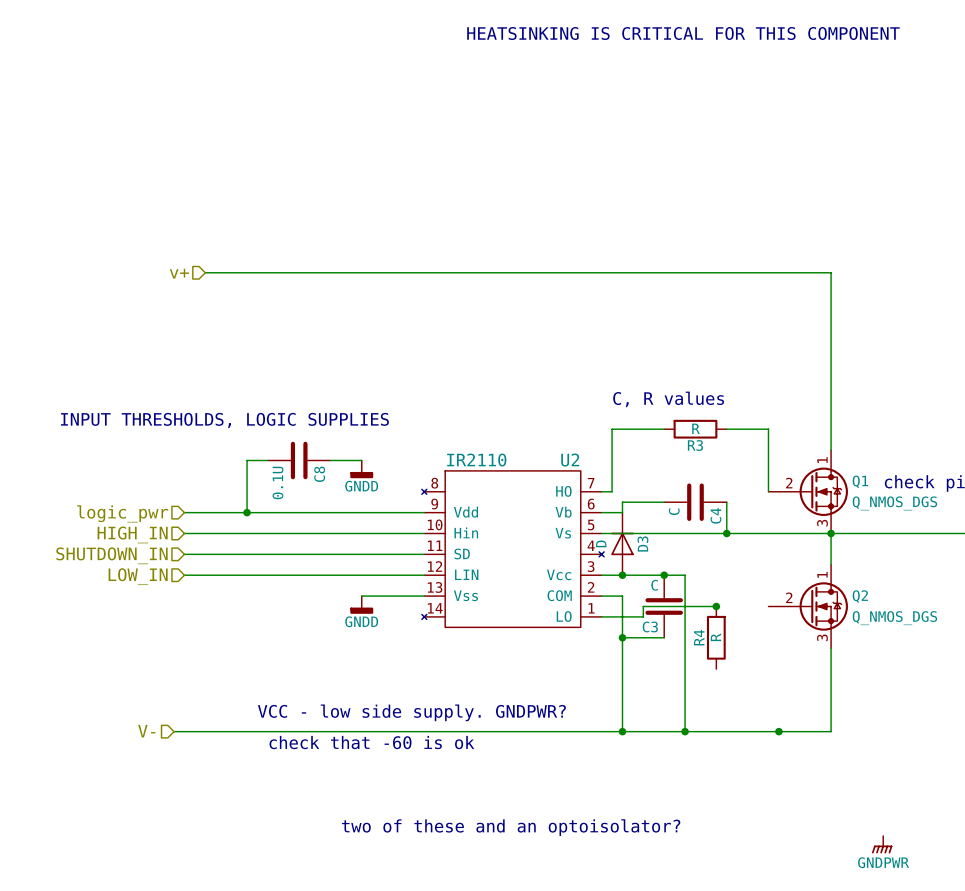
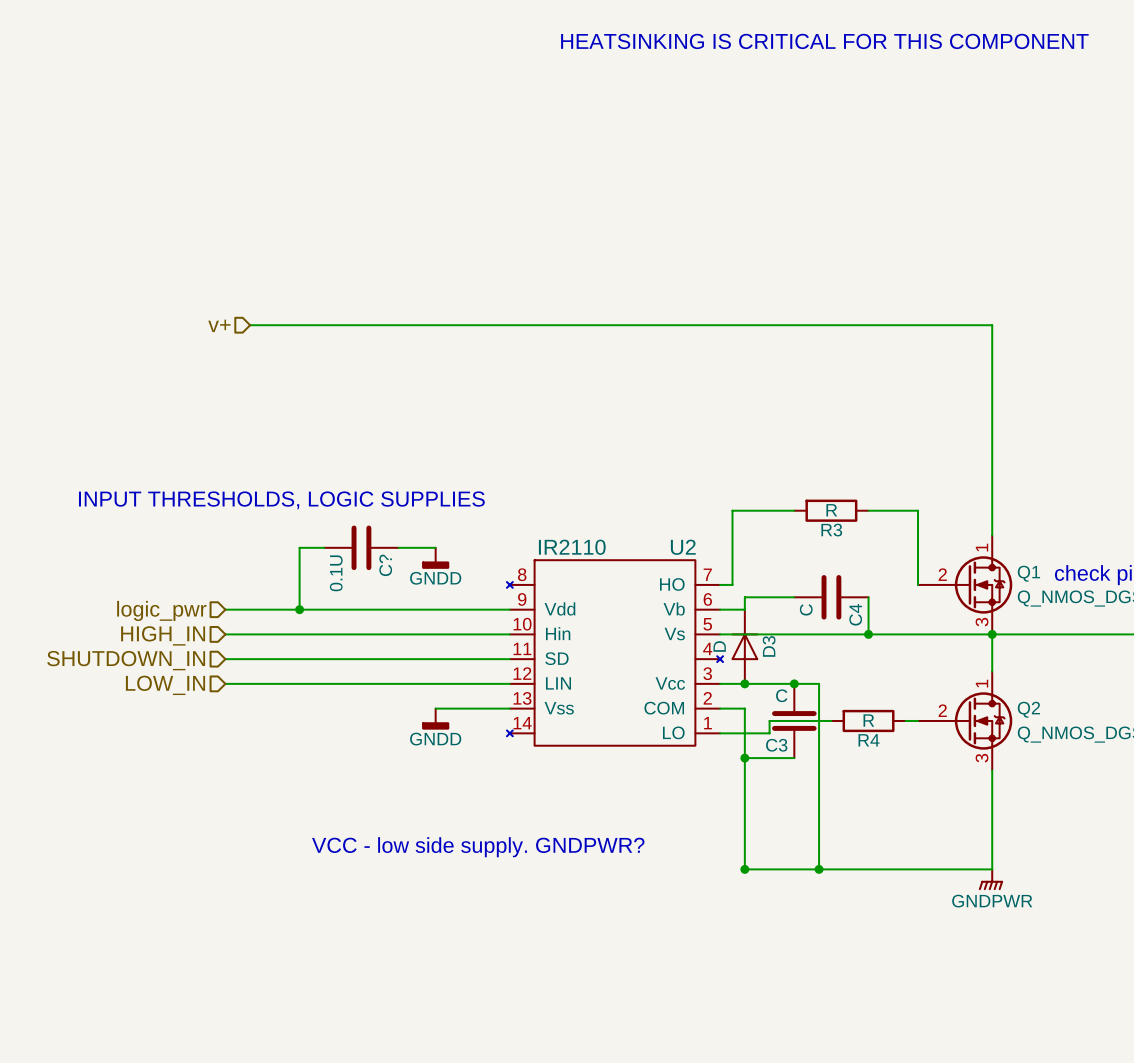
text: C, R values (668, 399) -> none
C8 name: C8 (319, 474) -> C? (385, 565)
junction: (716, 606) -> none
wire: none -> (905, 720) (918, 720)
R4 name position: R4 (699, 637) -> R4 (869, 740)
R4 rotation: 0° (716, 637) -> 90° clockwise (868, 720)
hierarchical label: V- (146, 731) -> none
wire: (174, 731) (622, 731) -> none
junction: (778, 731) -> none
text: check that -60 is ok (371, 742) -> none
text: two of these and an optoisolator? (511, 827) -> none
power symbol position: GNDPWR (882, 844) -> GNDPWR (990, 879)

